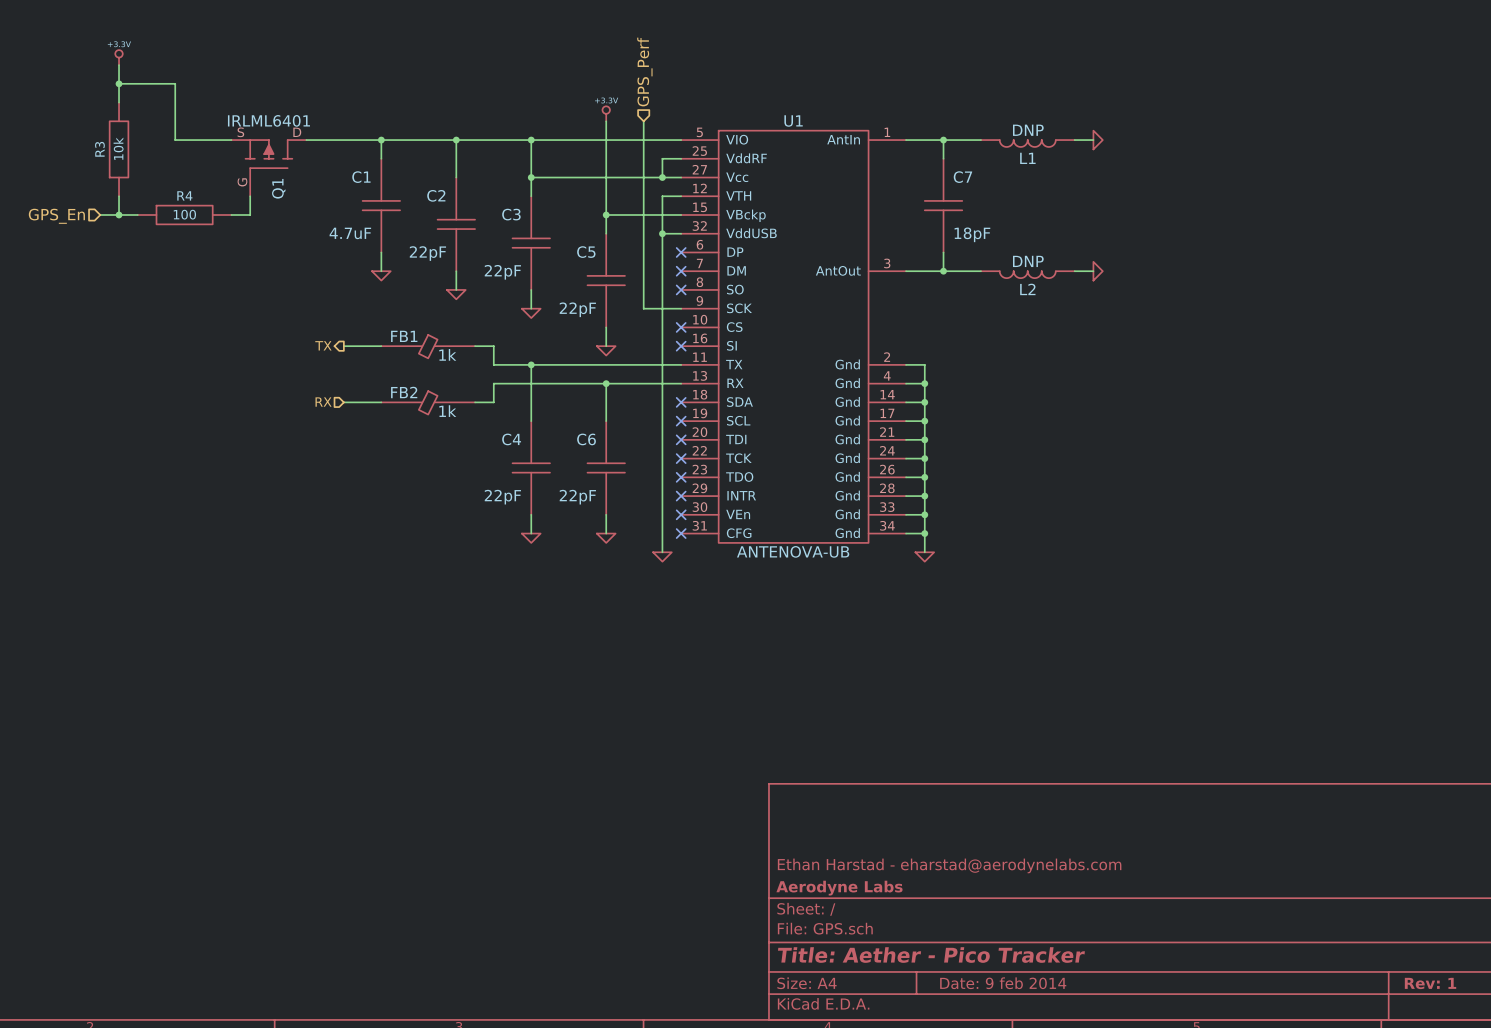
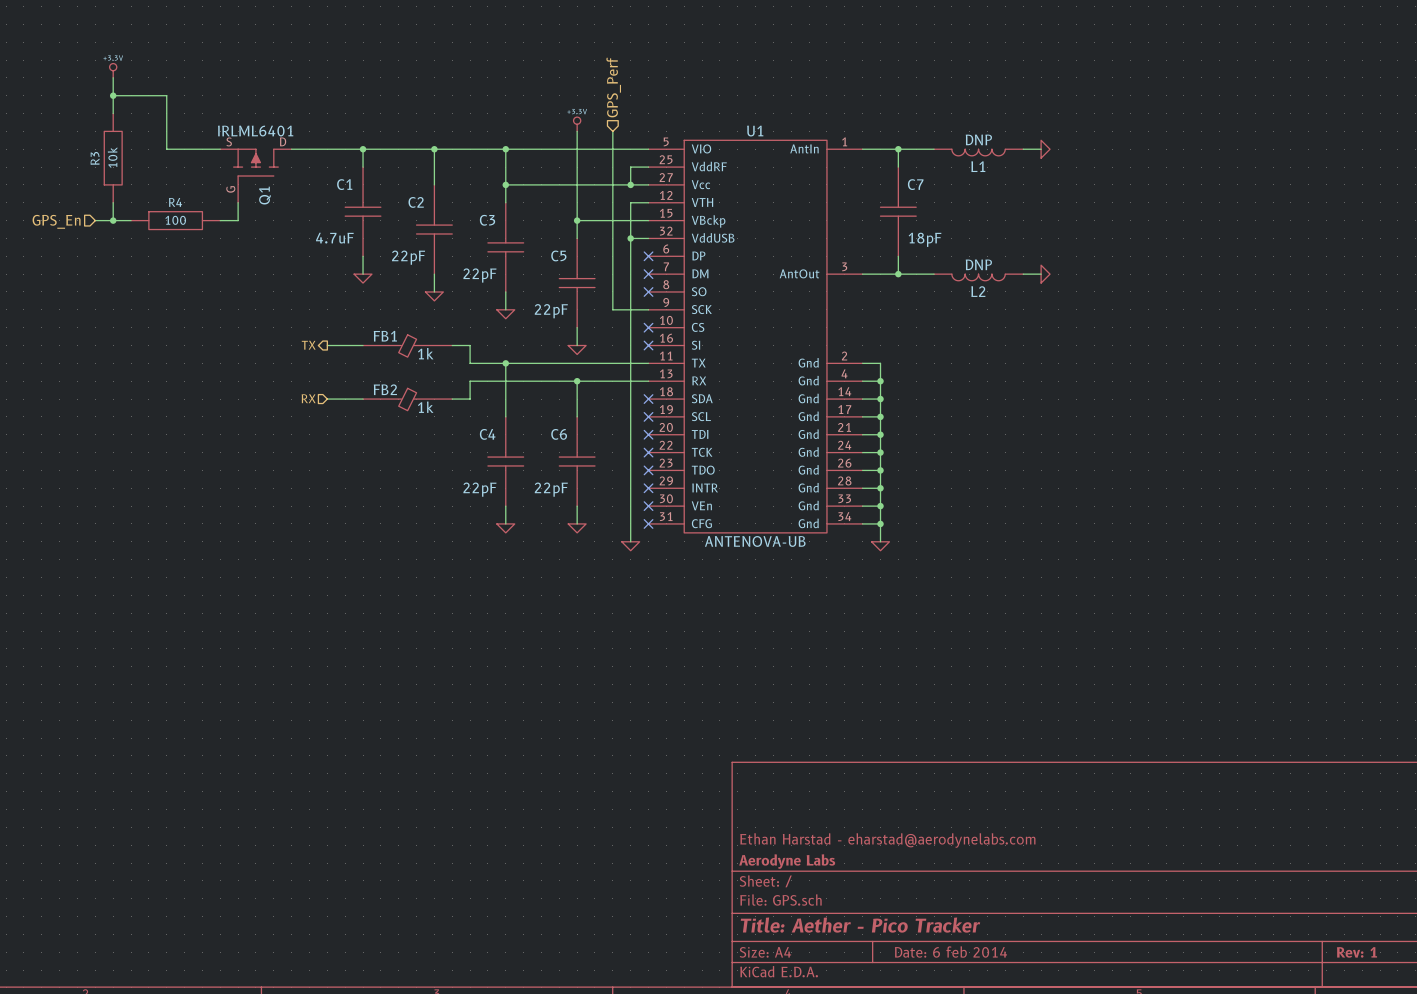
title block: Date: 9 feb 2014 (1003, 983) -> Date: 6 feb 2014 (950, 952)

